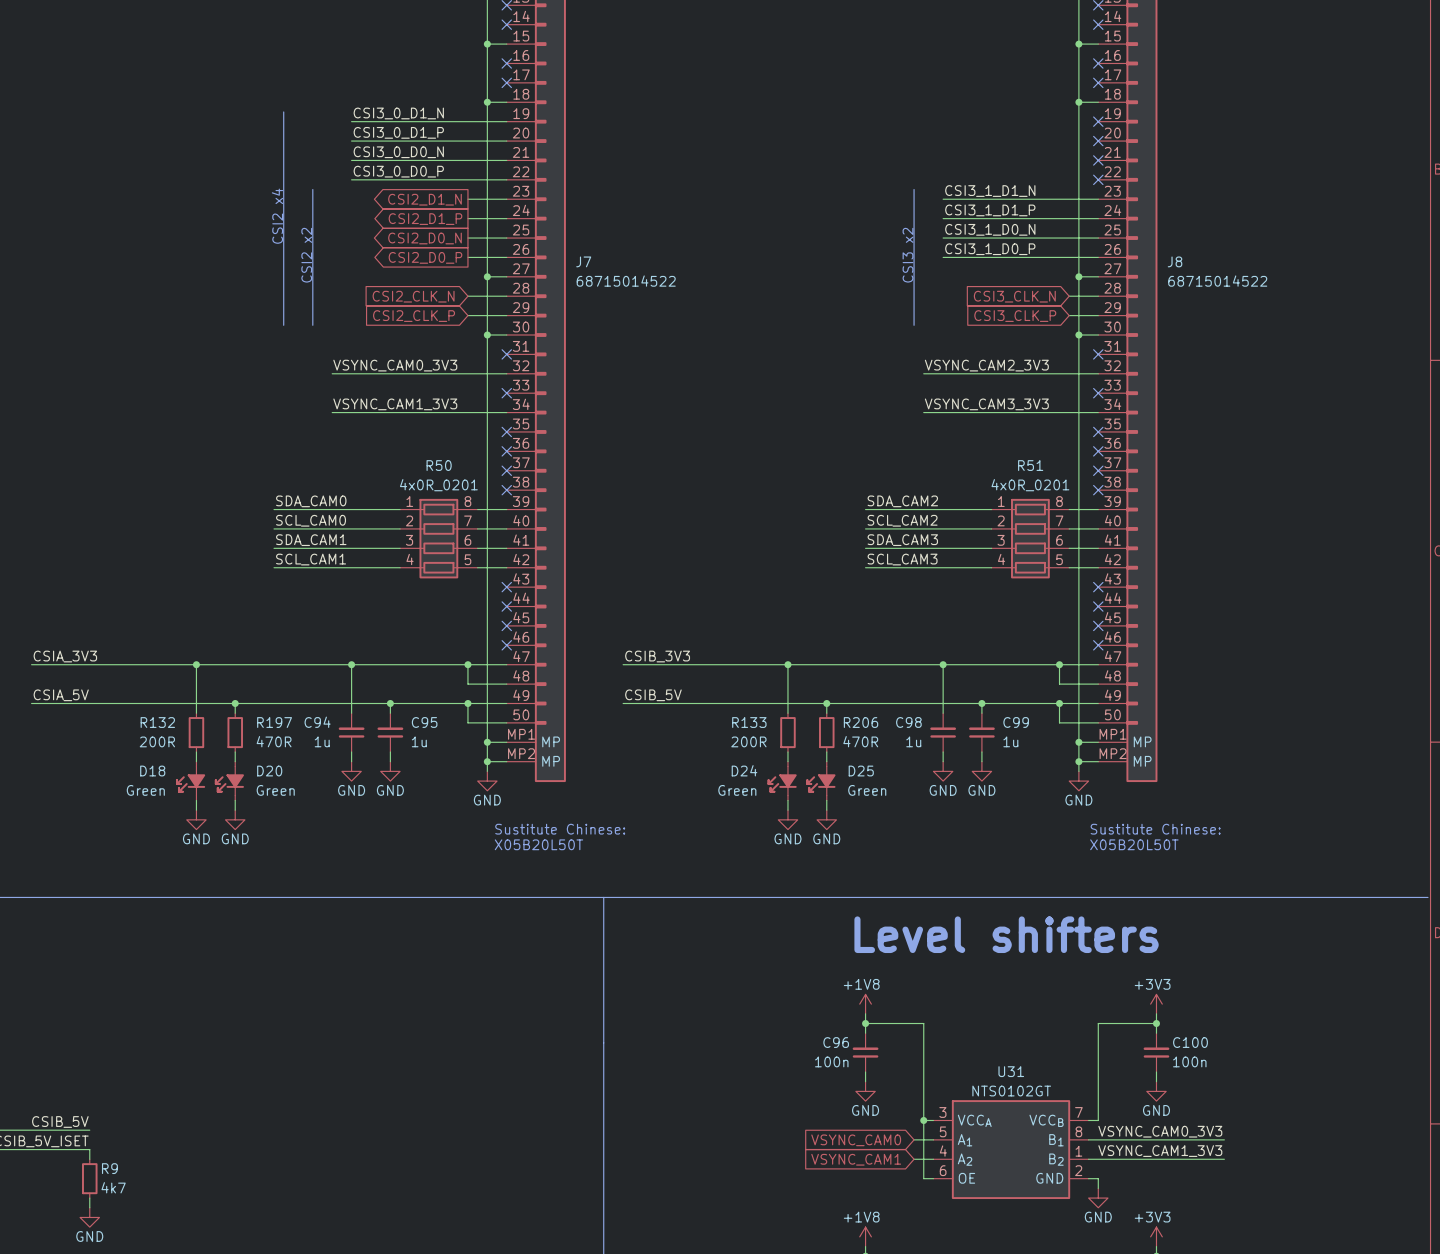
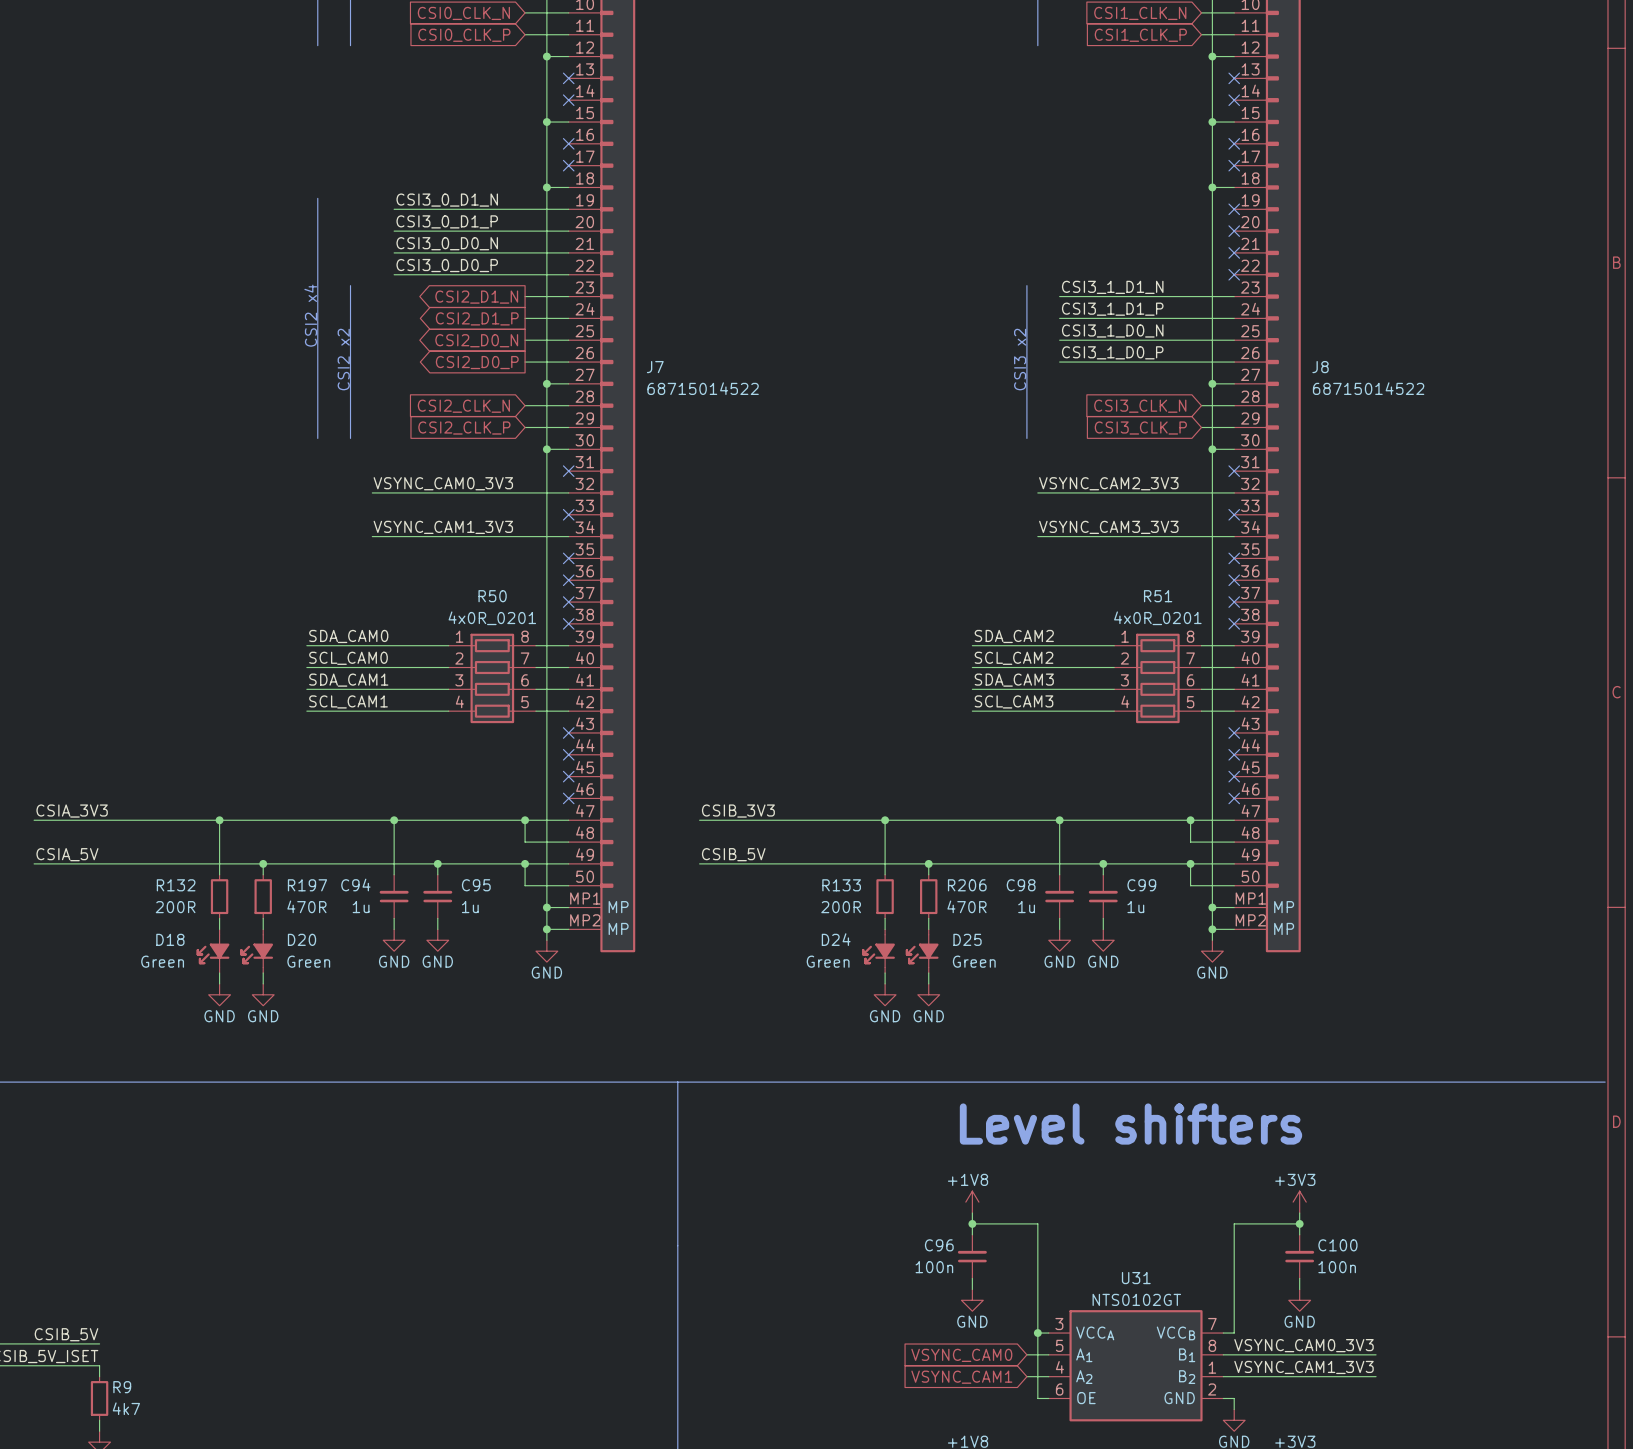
text: Sustitute Chinese: (560, 829) -> none
text: Sustitute Chinese: (1155, 829) -> none
text: X05B20L50T (538, 844) -> none
text: X05B20L50T (1134, 844) -> none

